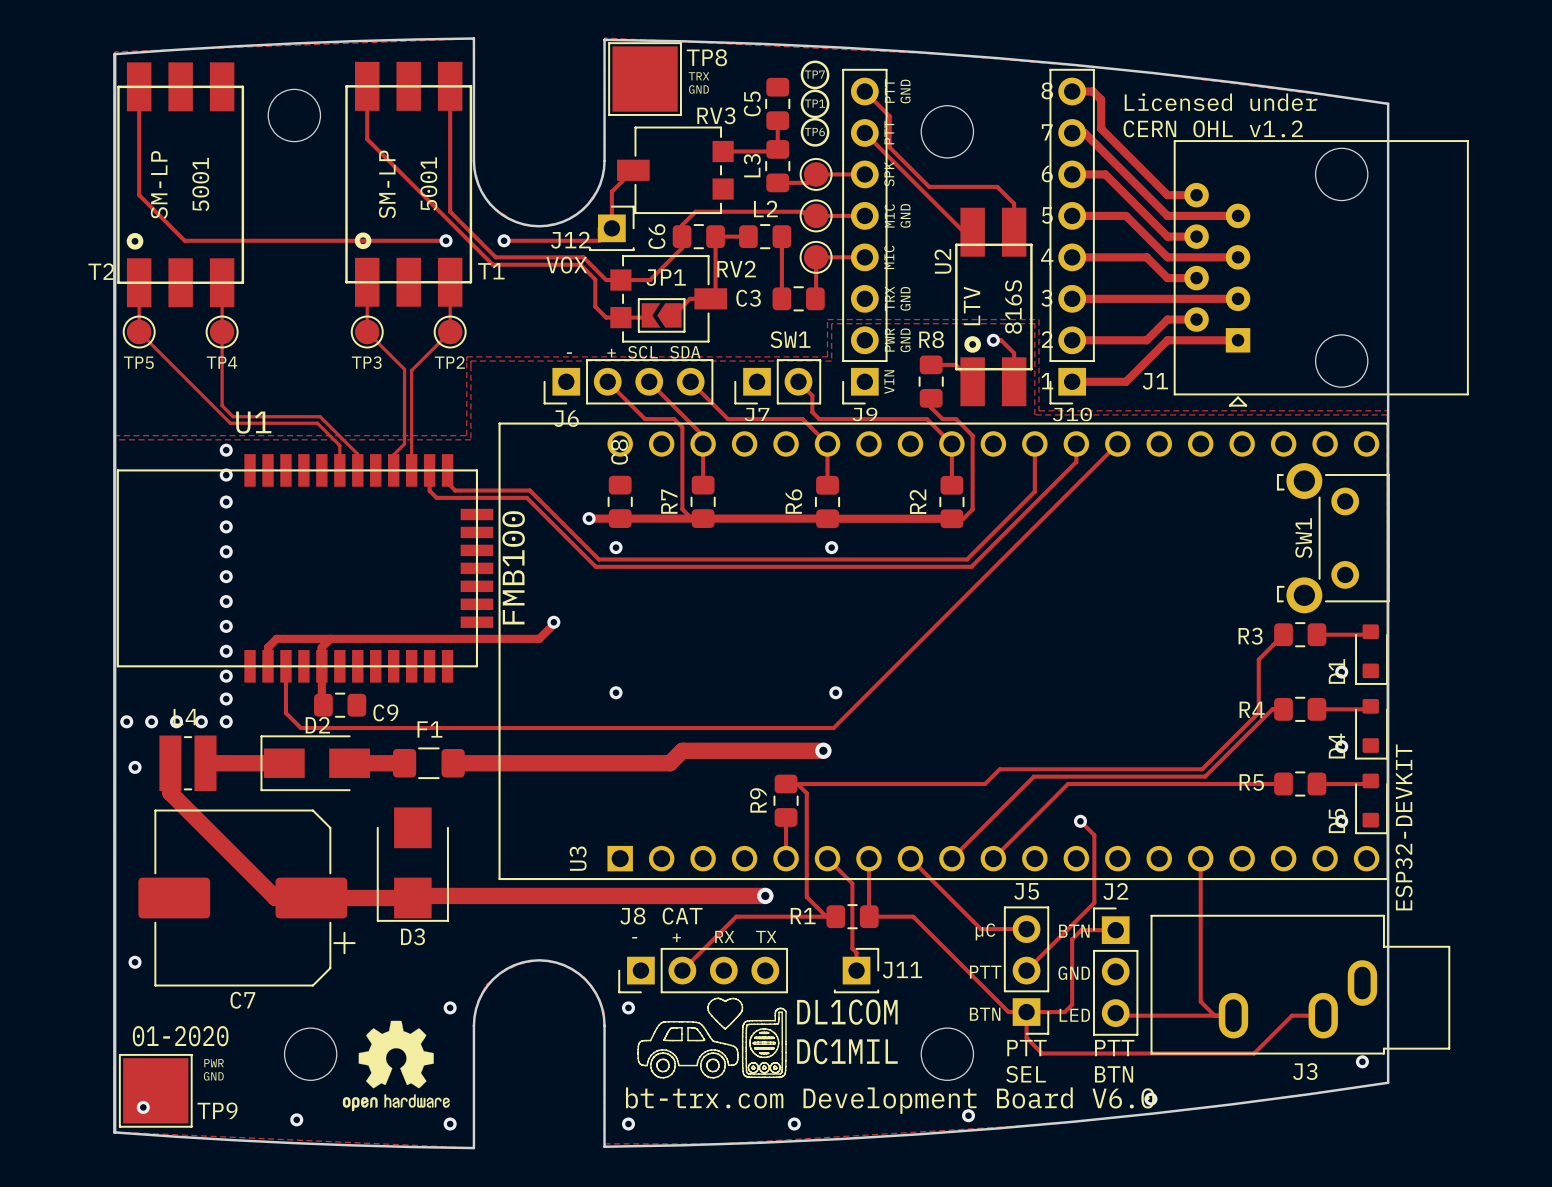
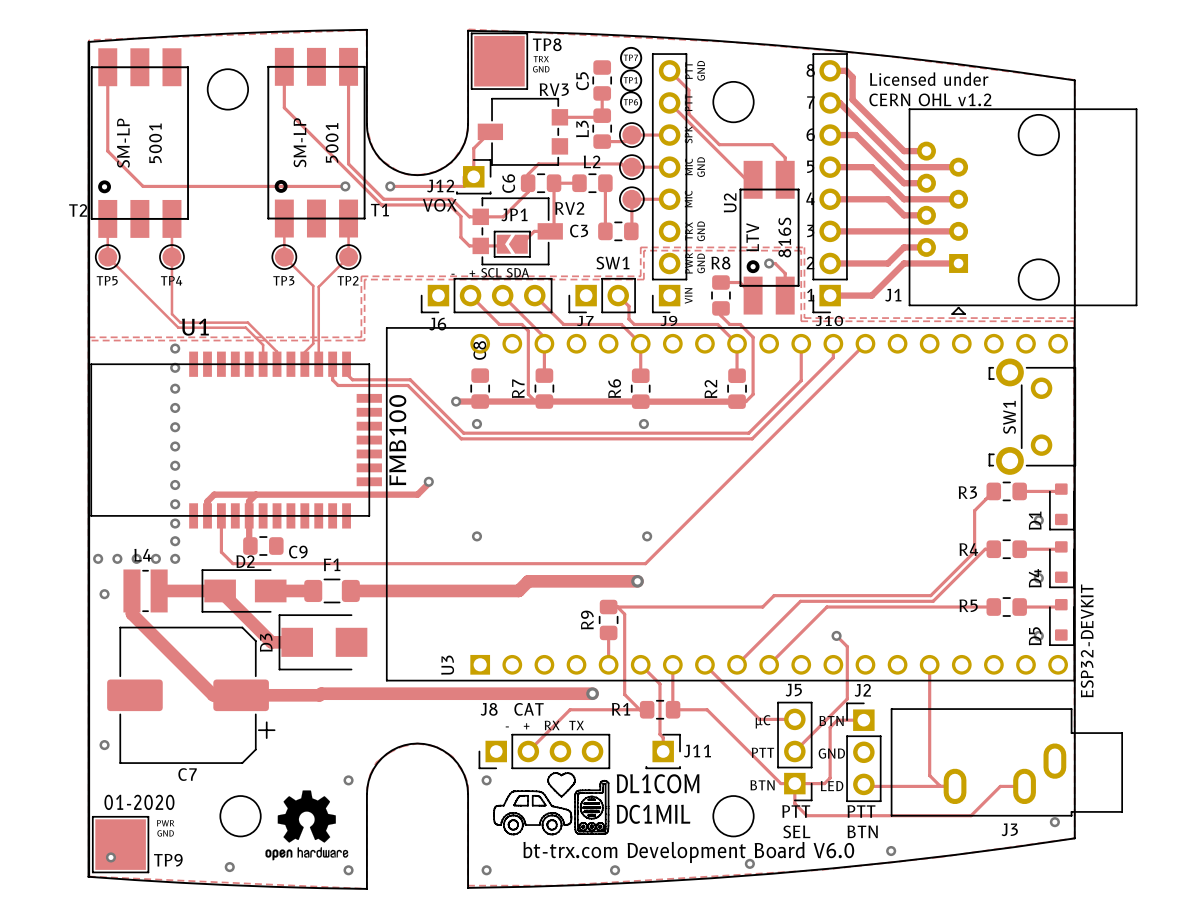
track: none -> (220, 590) (271, 642) (297, 642)
D3 rotation: 0° (412, 864) -> 90° clockwise (323, 642)

